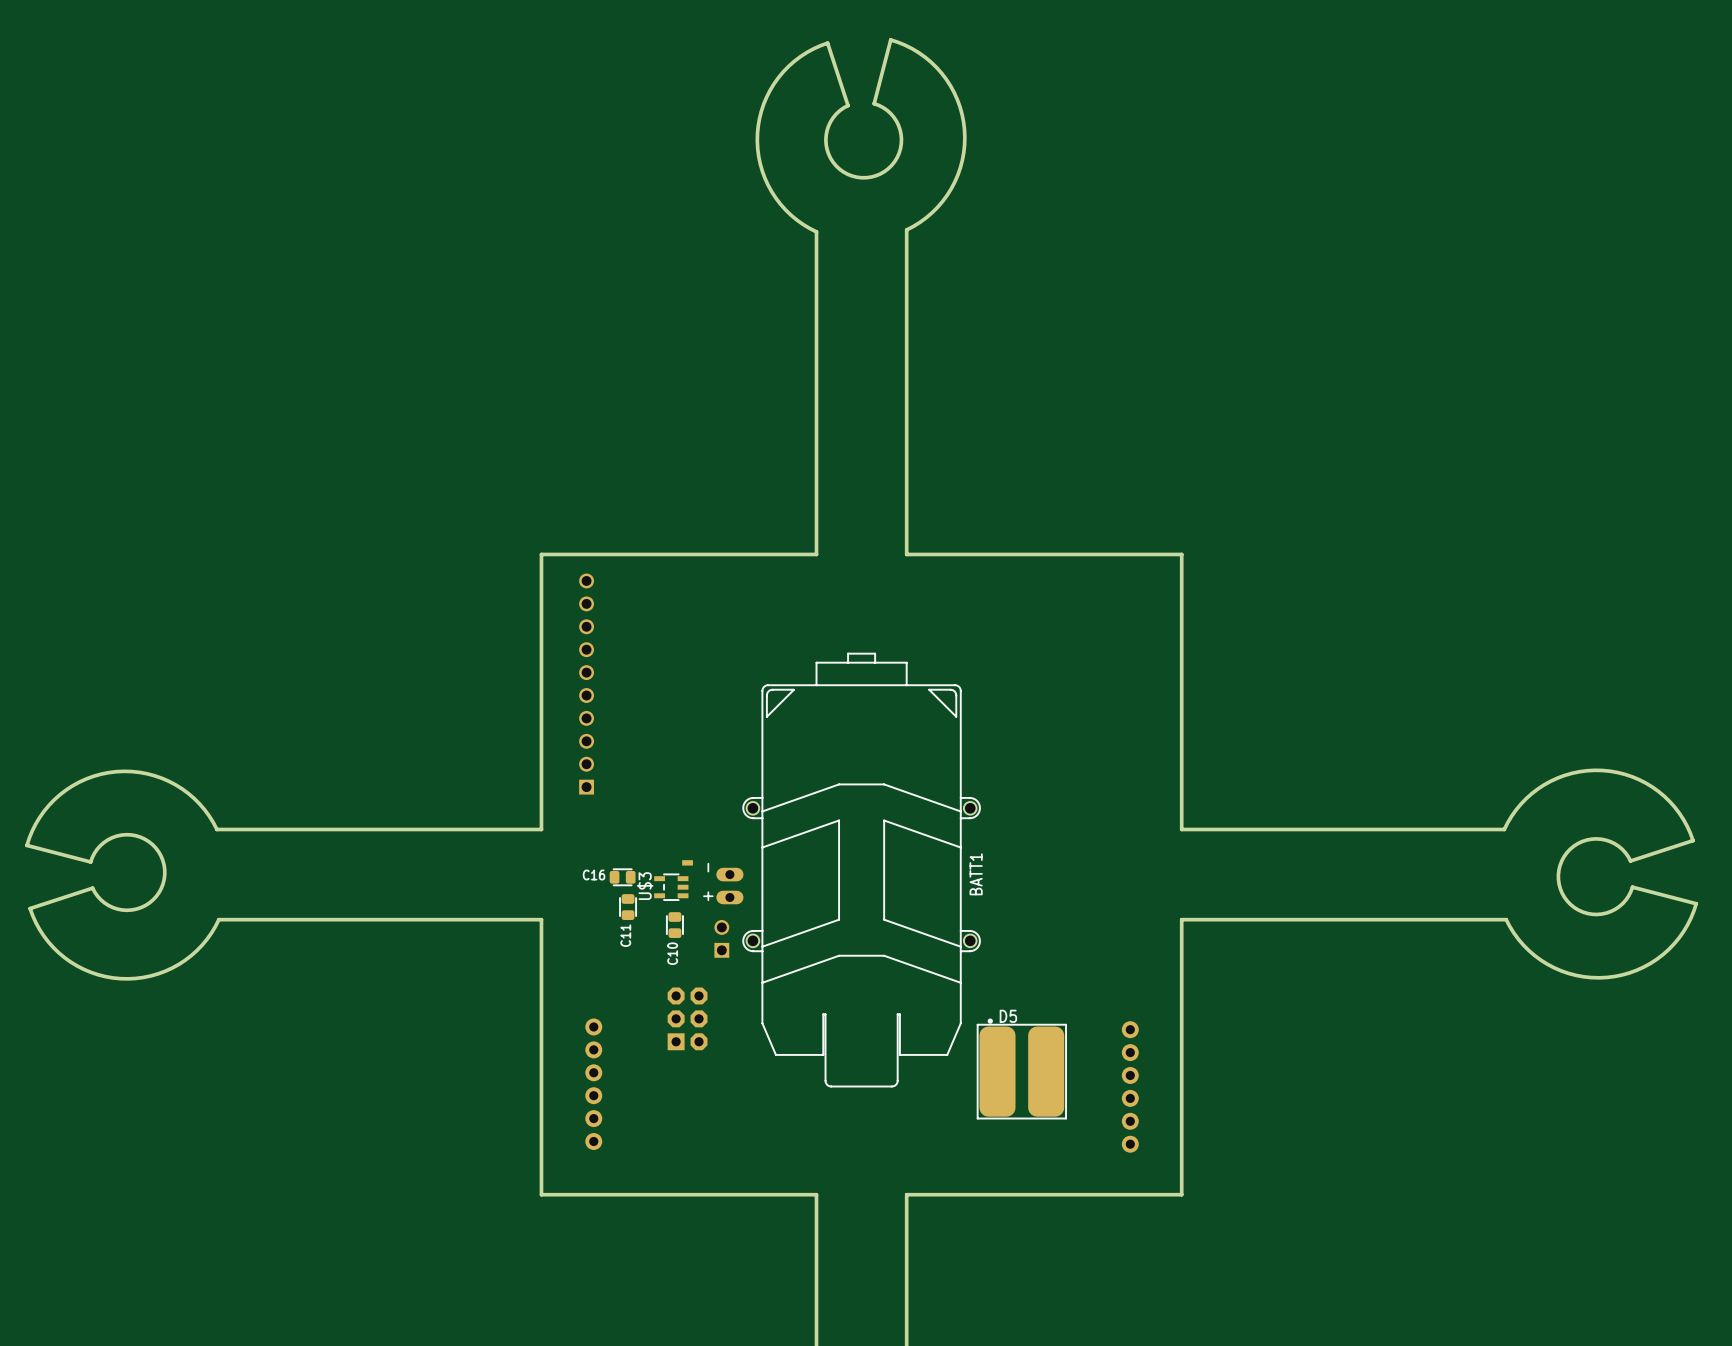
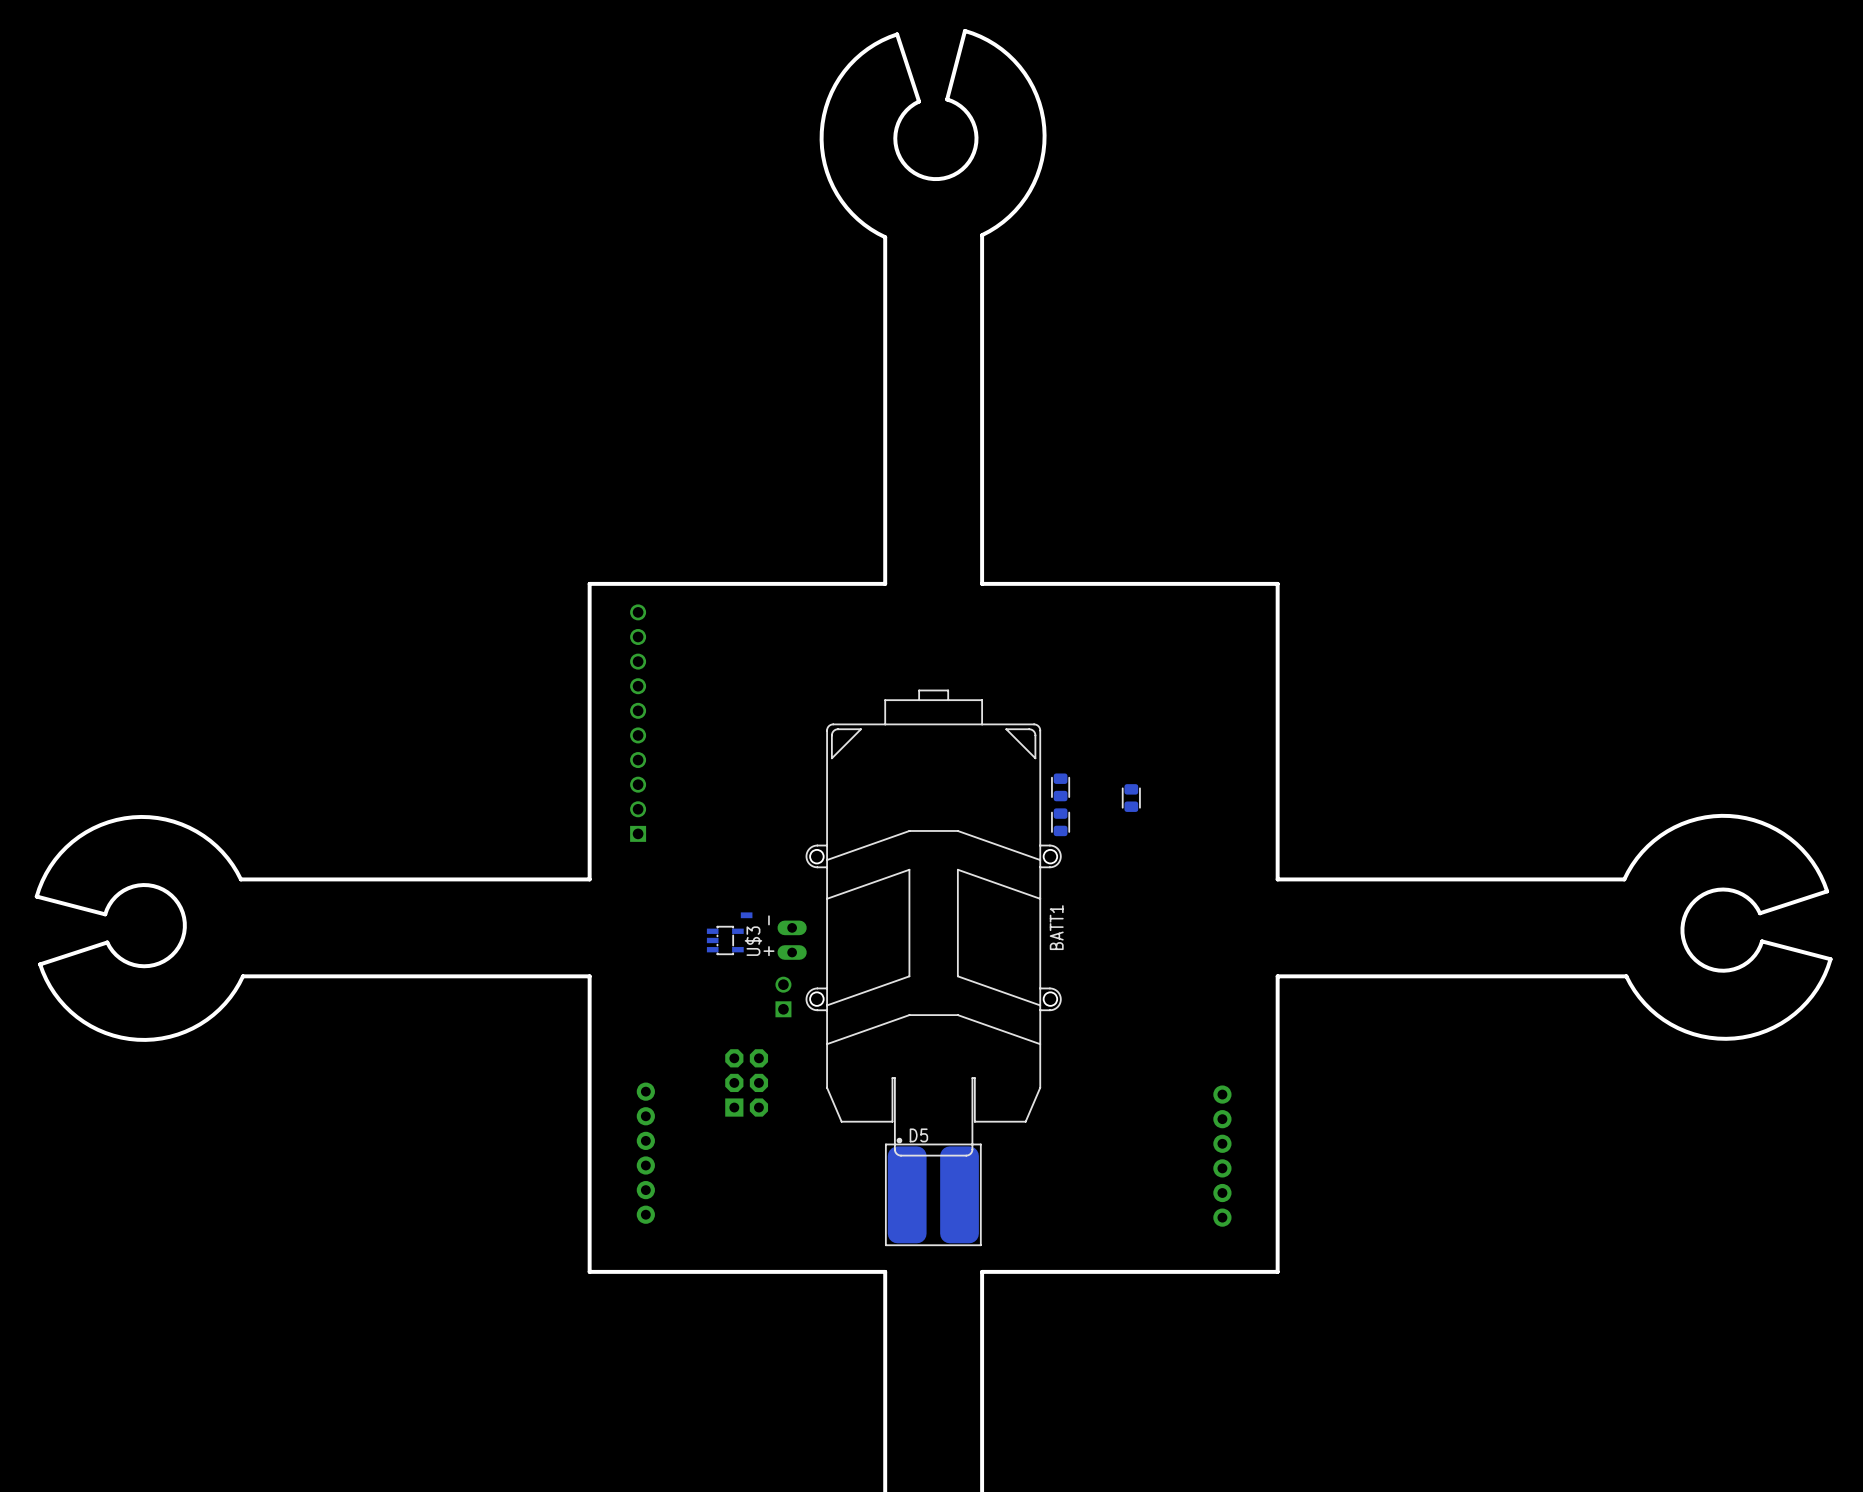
part: none -> (1060, 787)
part: none -> (1131, 798)
part: none -> (1060, 822)
U$3 footprint: [654, 873, 689, 901] -> [706, 925, 744, 956]
C16: (622, 877) -> none
U$3 name position: U$3 (645, 886) -> U$3 (753, 941)
C11: (628, 907) -> none
C10: (674, 925) -> none
D5 position: (1021, 1068) -> (933, 1191)

